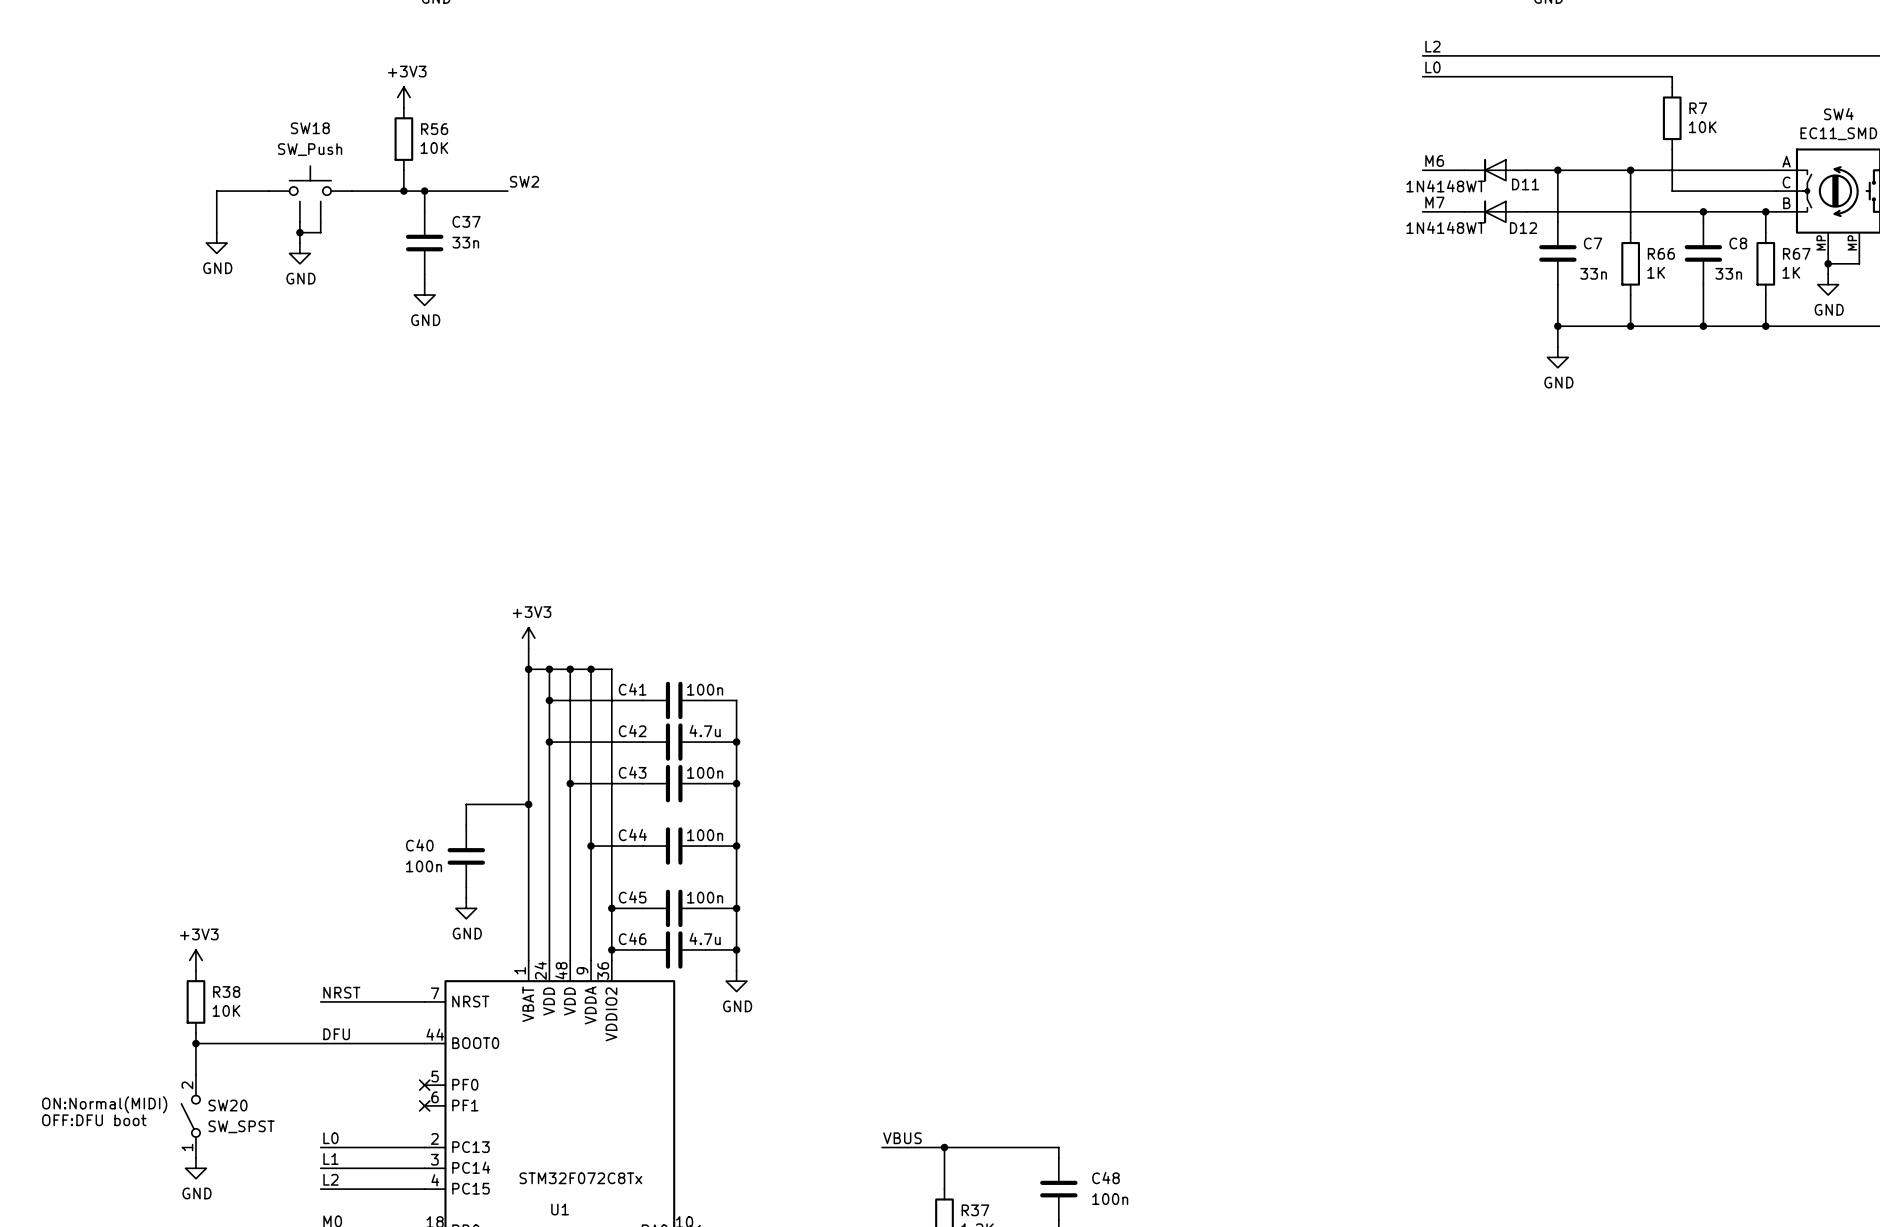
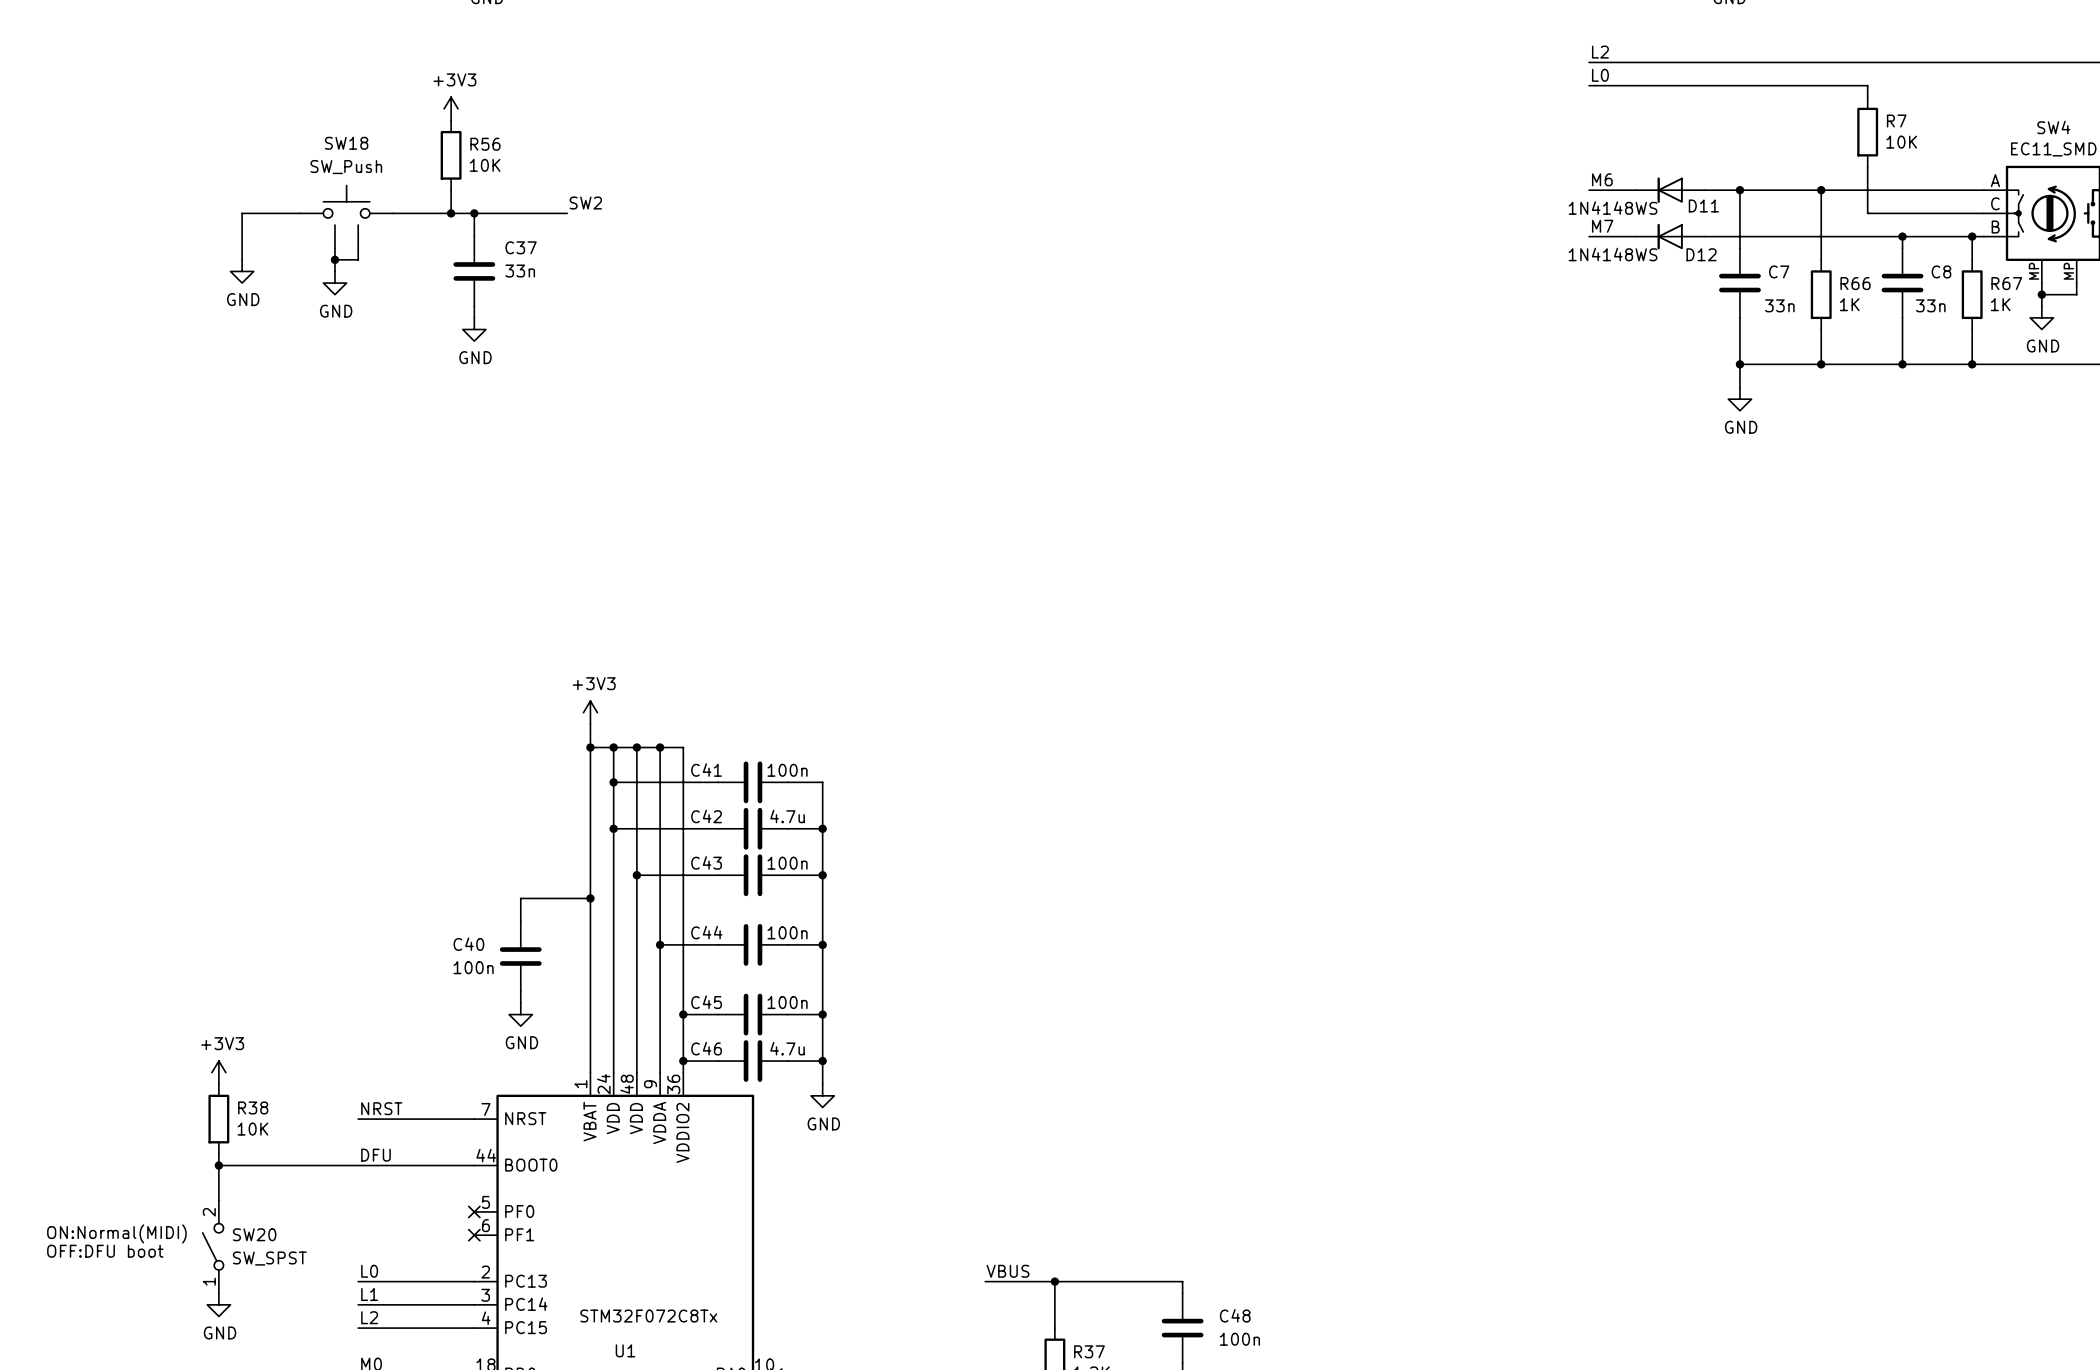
D11 value: 1N4148WT (1445, 186) -> 1N4148WS (1613, 208)
D12 value: 1N4148WT (1445, 227) -> 1N4148WS (1613, 254)

